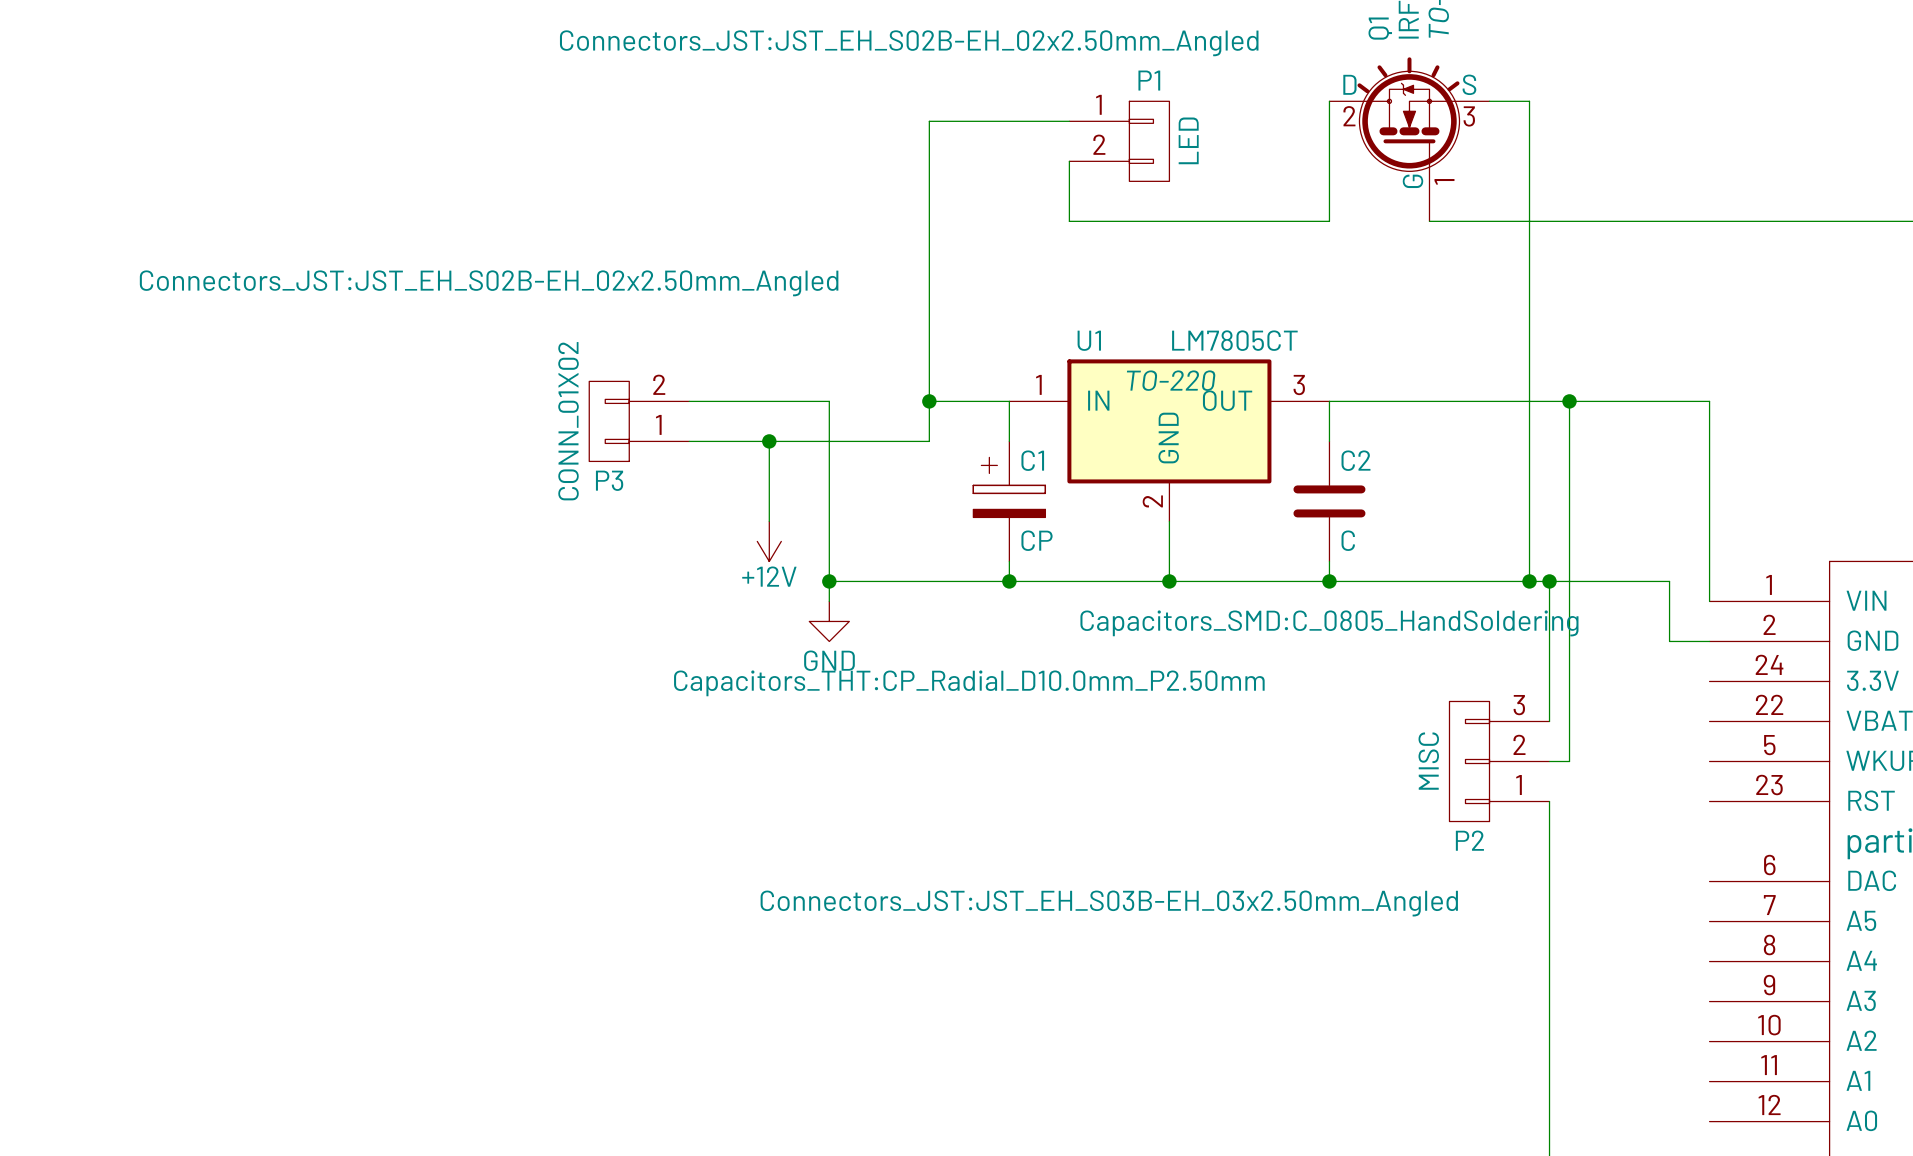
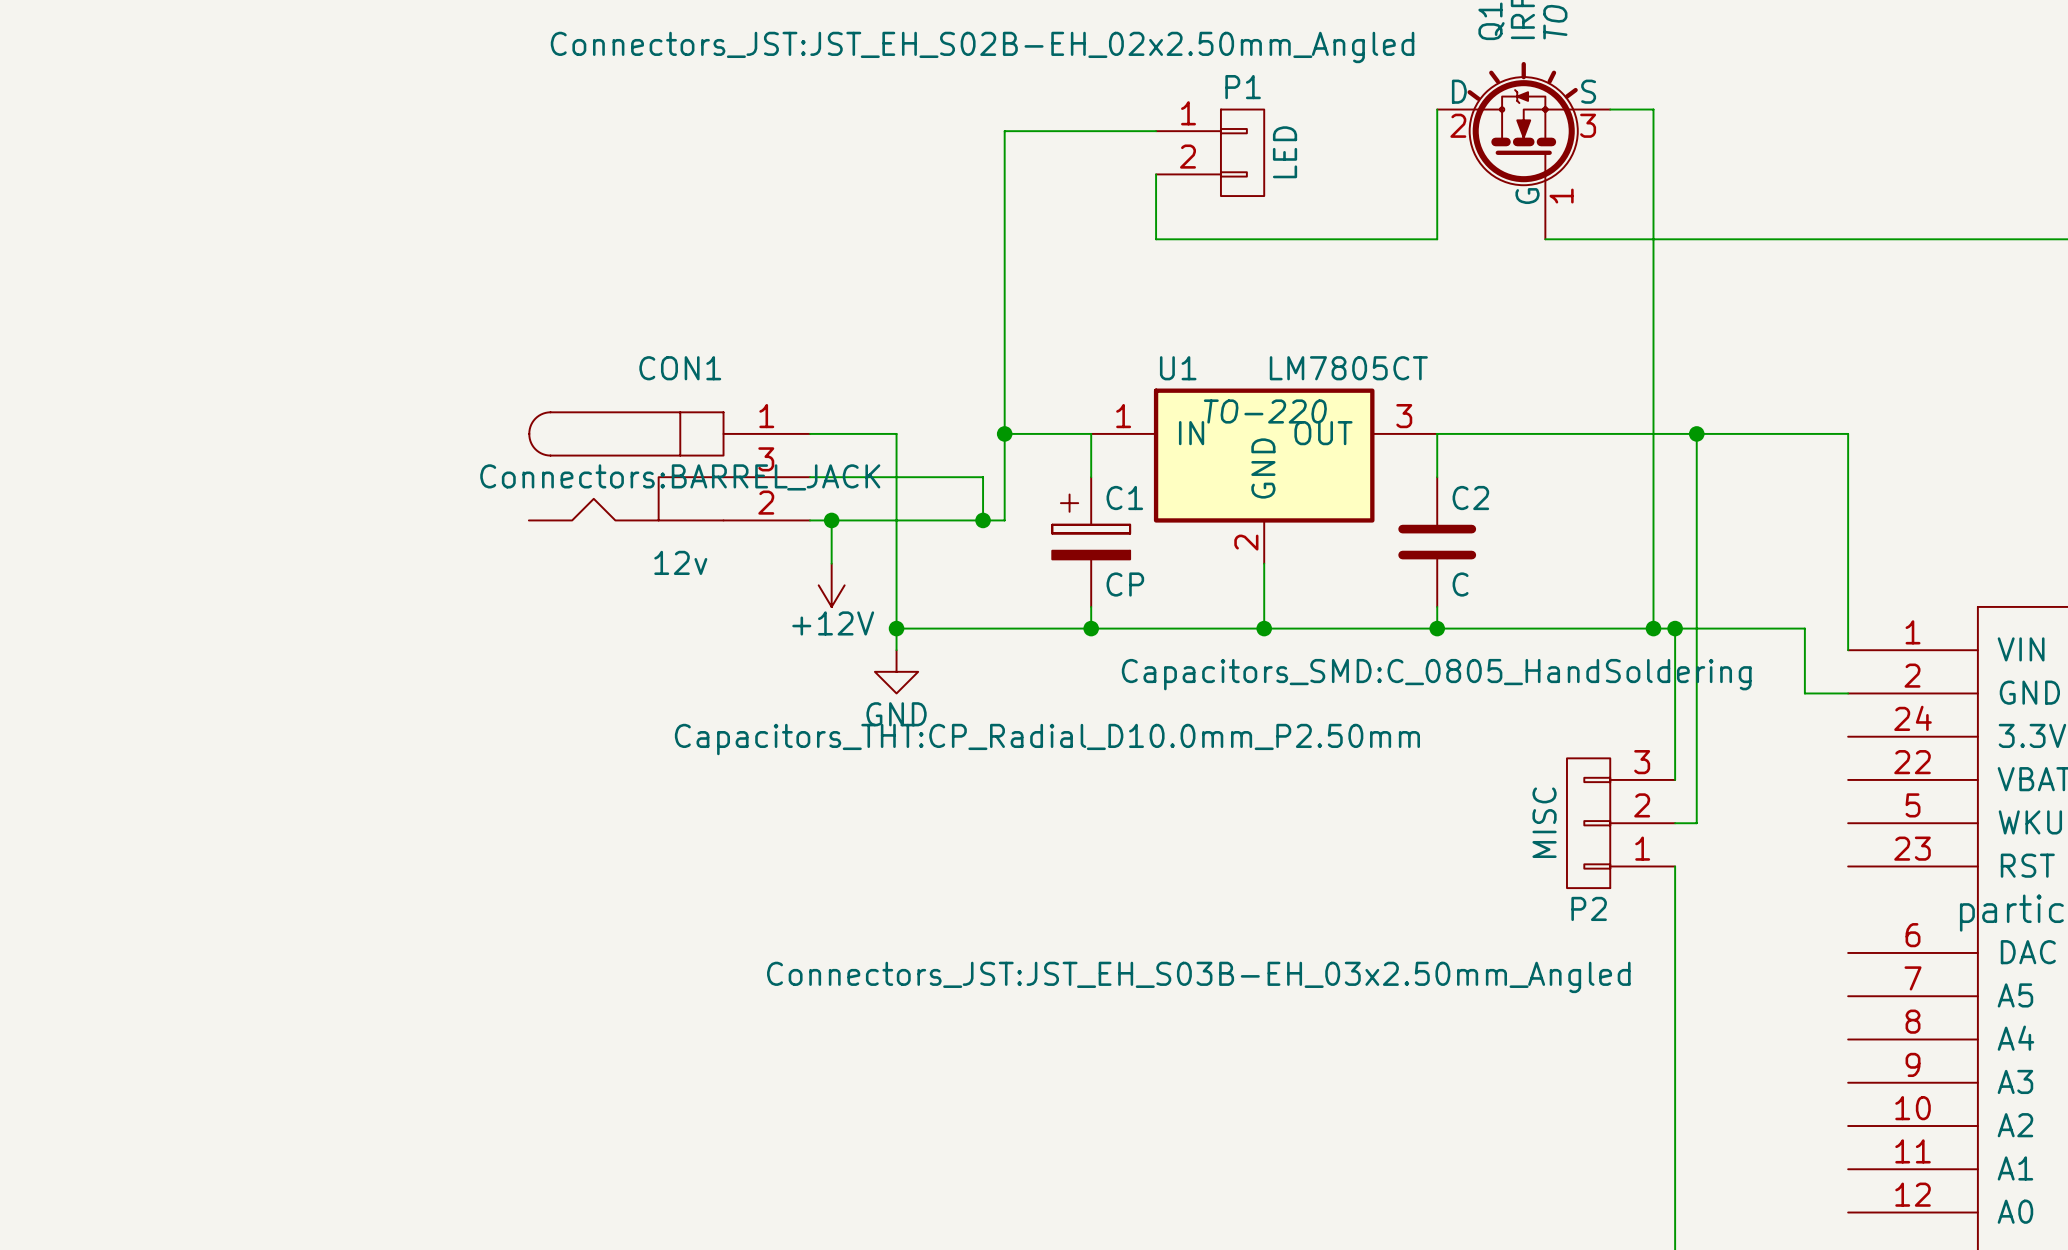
P3: CONN_01X02 (639, 421) -> none
CON1: none -> 12v (669, 466)
wire: (769, 441) (769, 481) -> none
junction position: (769, 441) -> (831, 520)
wire: (909, 441) (929, 441) -> (983, 477) (983, 520)
wire: none -> (1004, 477) (1004, 520) (810, 520)
junction: none -> (983, 520)

